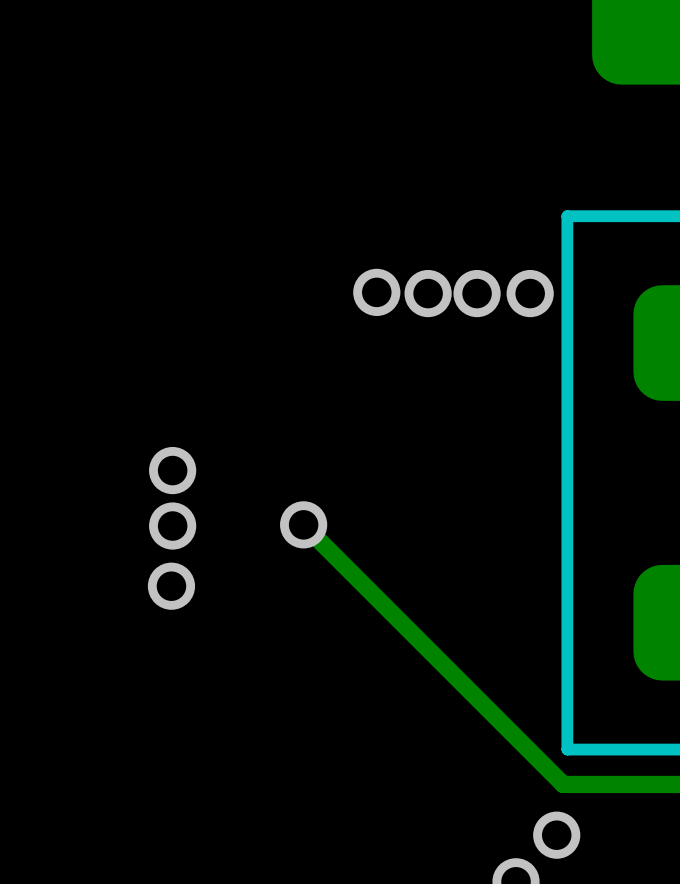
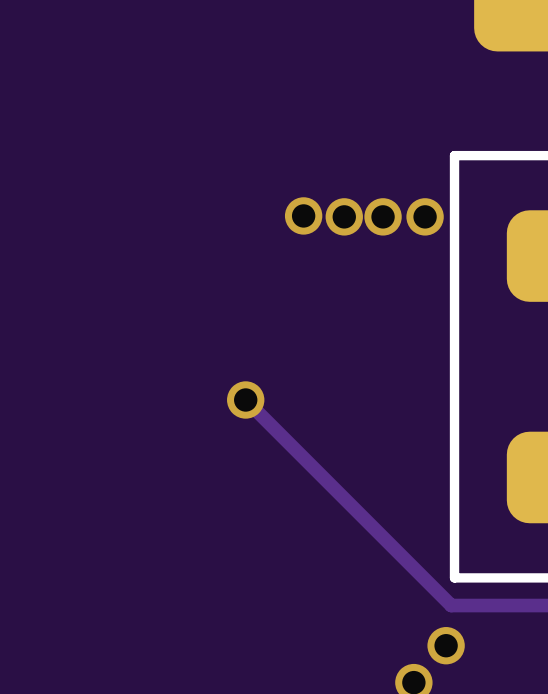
via: (172, 470) -> none
via: (172, 526) -> none
via: (171, 586) -> none

